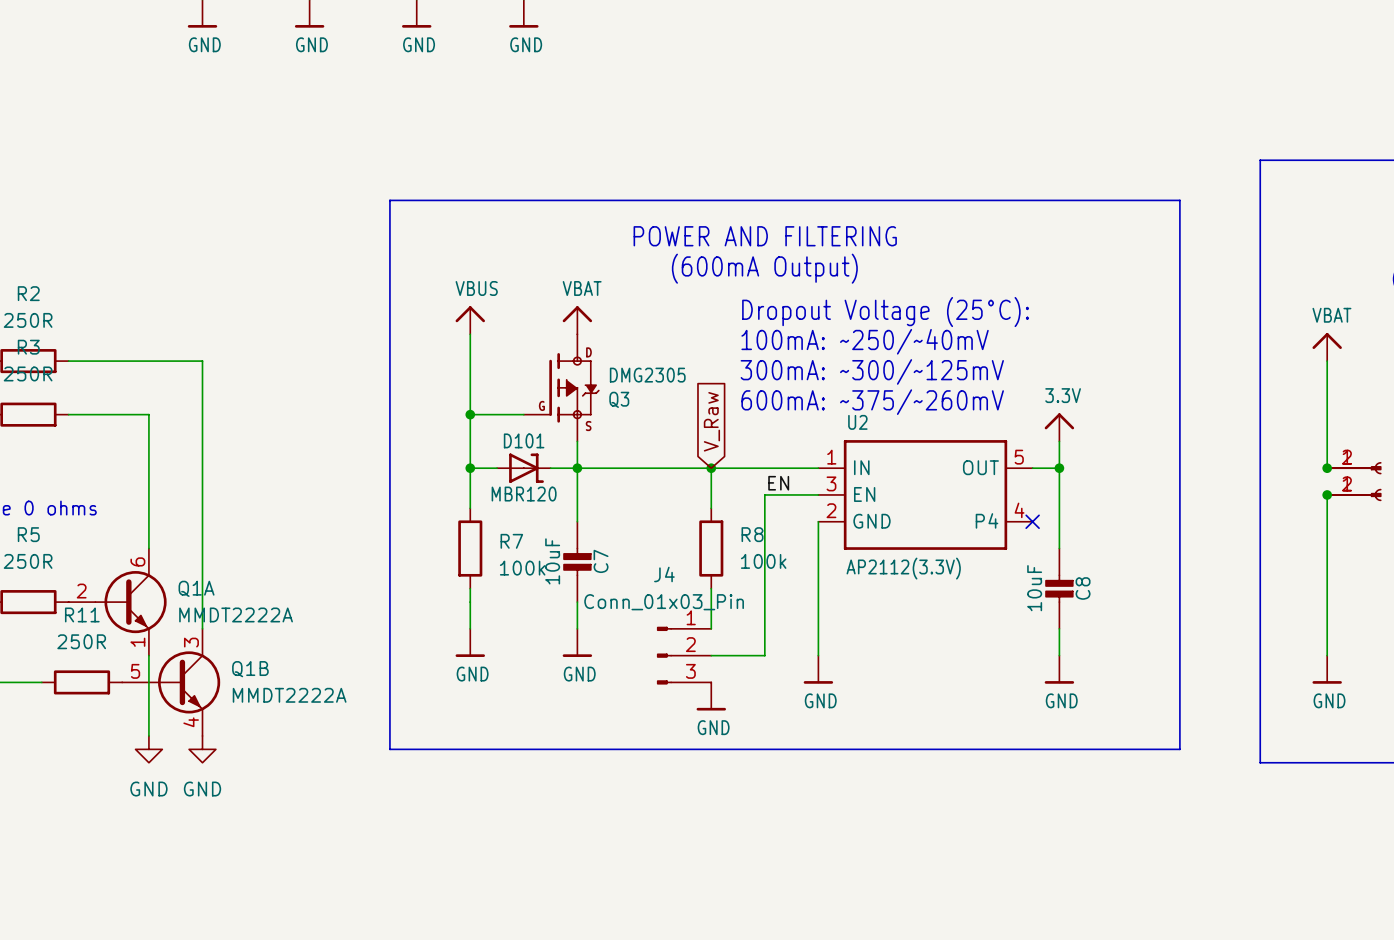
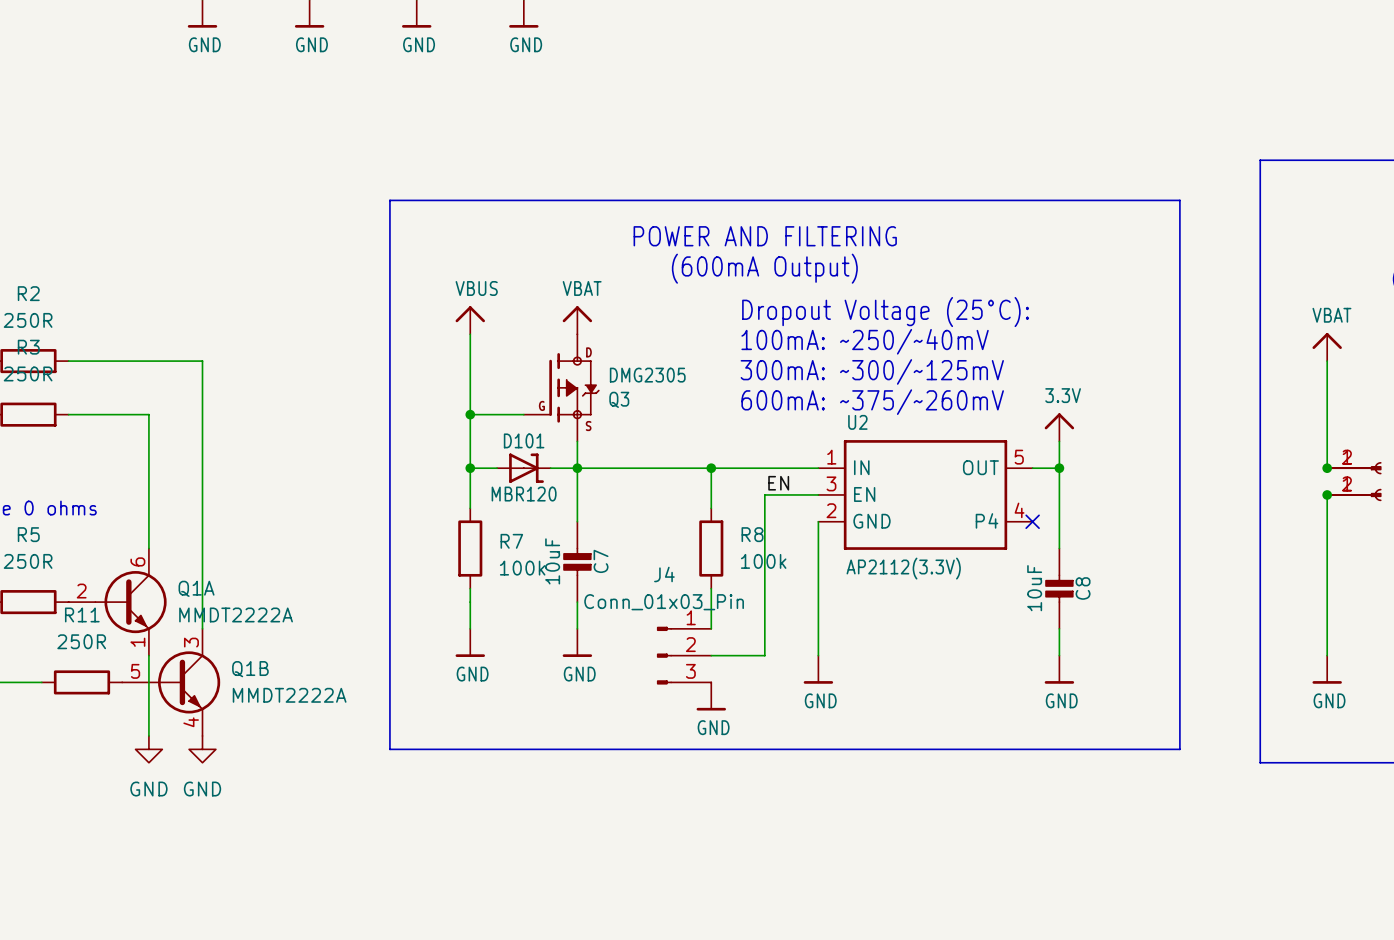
global label: V_Raw (711, 421) -> none

